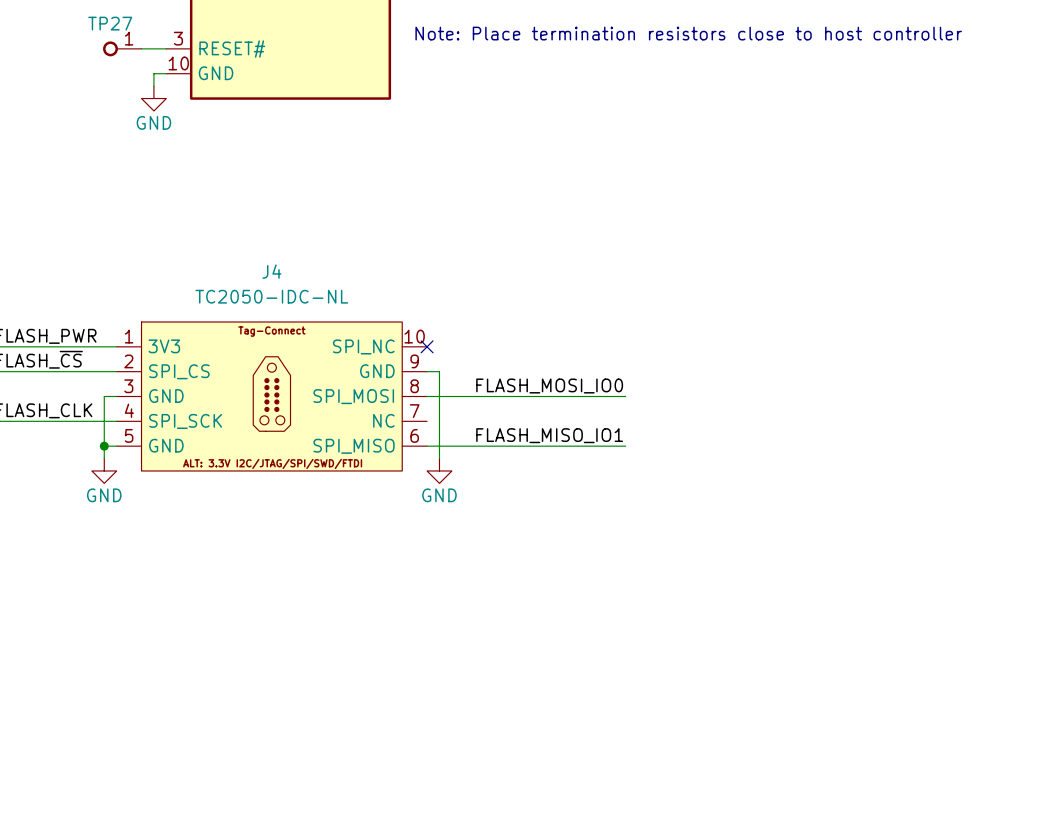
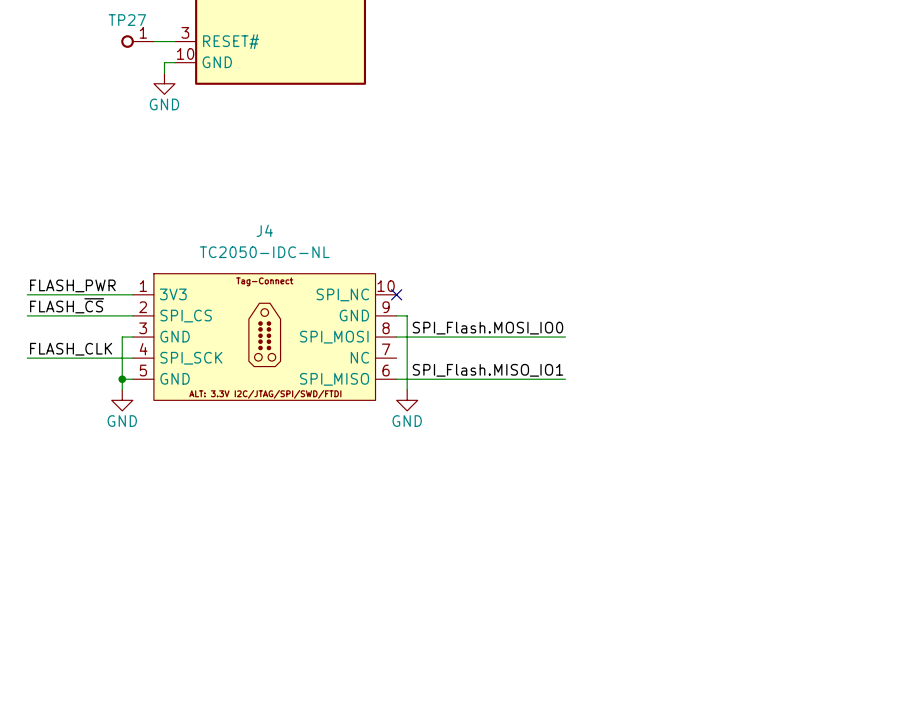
text: Note: Place termination resistors close to host controller (688, 33) -> none
label: FLASH_MOSI_IO0 (549, 386) -> SPI_Flash.MOSI_IO0 (488, 328)
label: FLASH_MISO_IO1 (549, 435) -> SPI_Flash.MISO_IO1 (488, 370)

